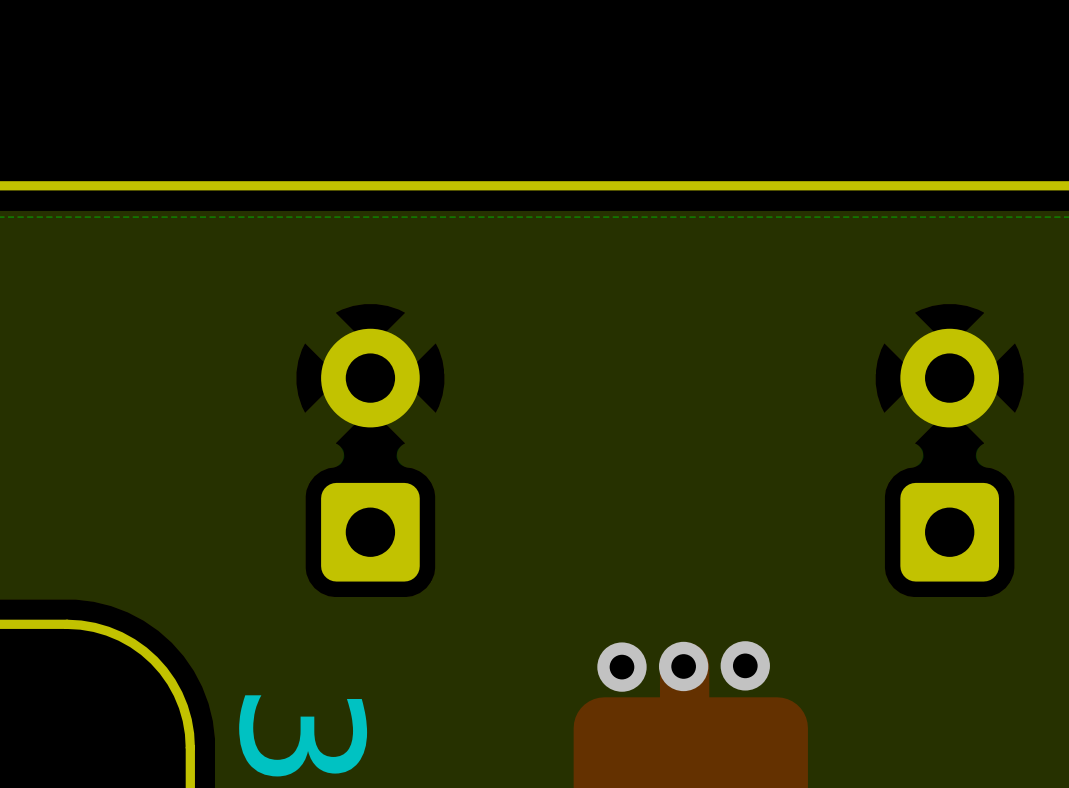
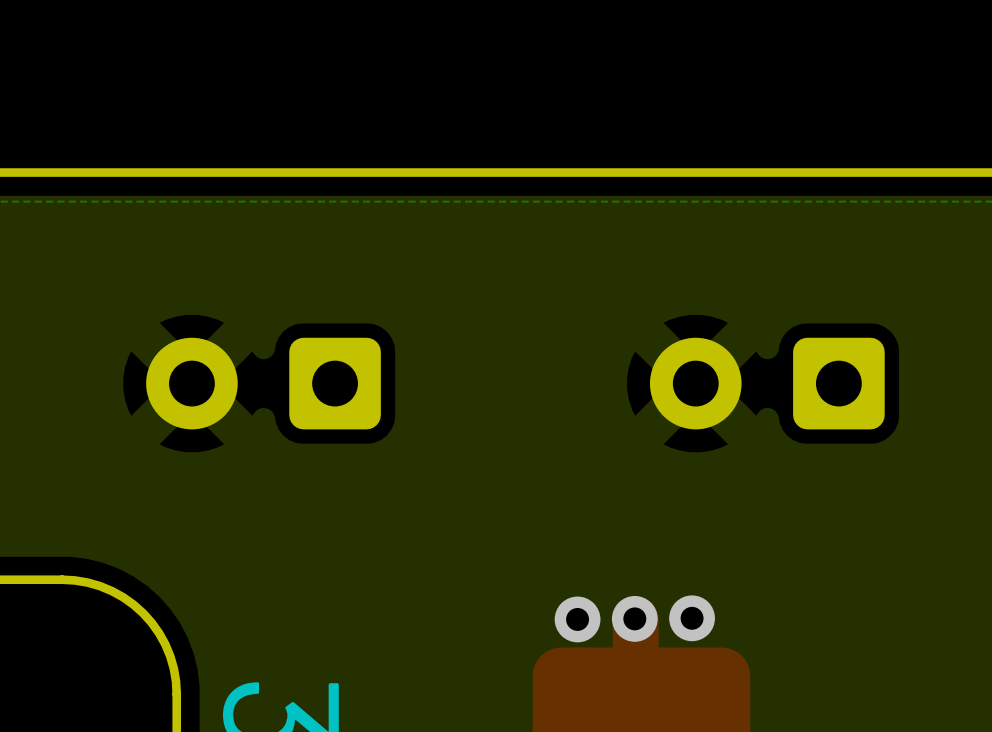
part rotation: 0° (370, 455) -> 90° counterclockwise (263, 383)
part rotation: 0° (949, 455) -> 90° counterclockwise (767, 383)

